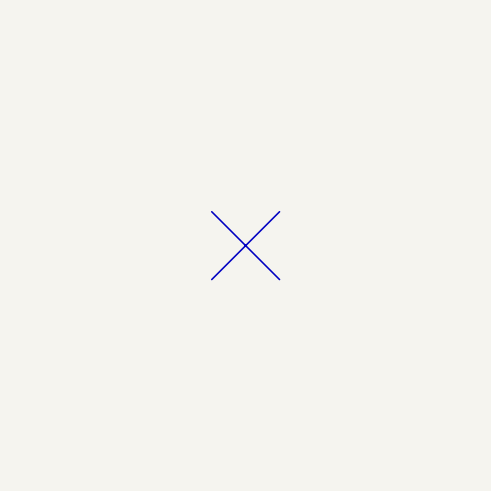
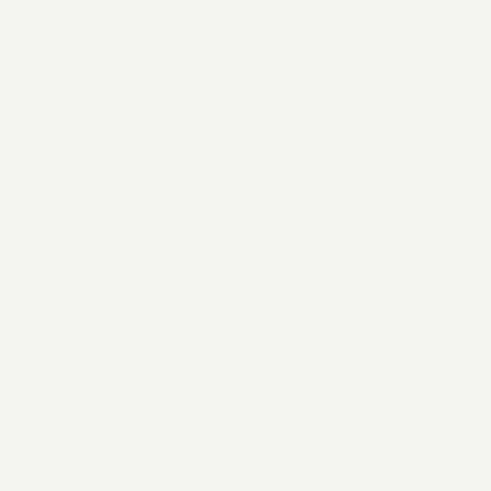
no-connect mark: (245, 245) -> none

